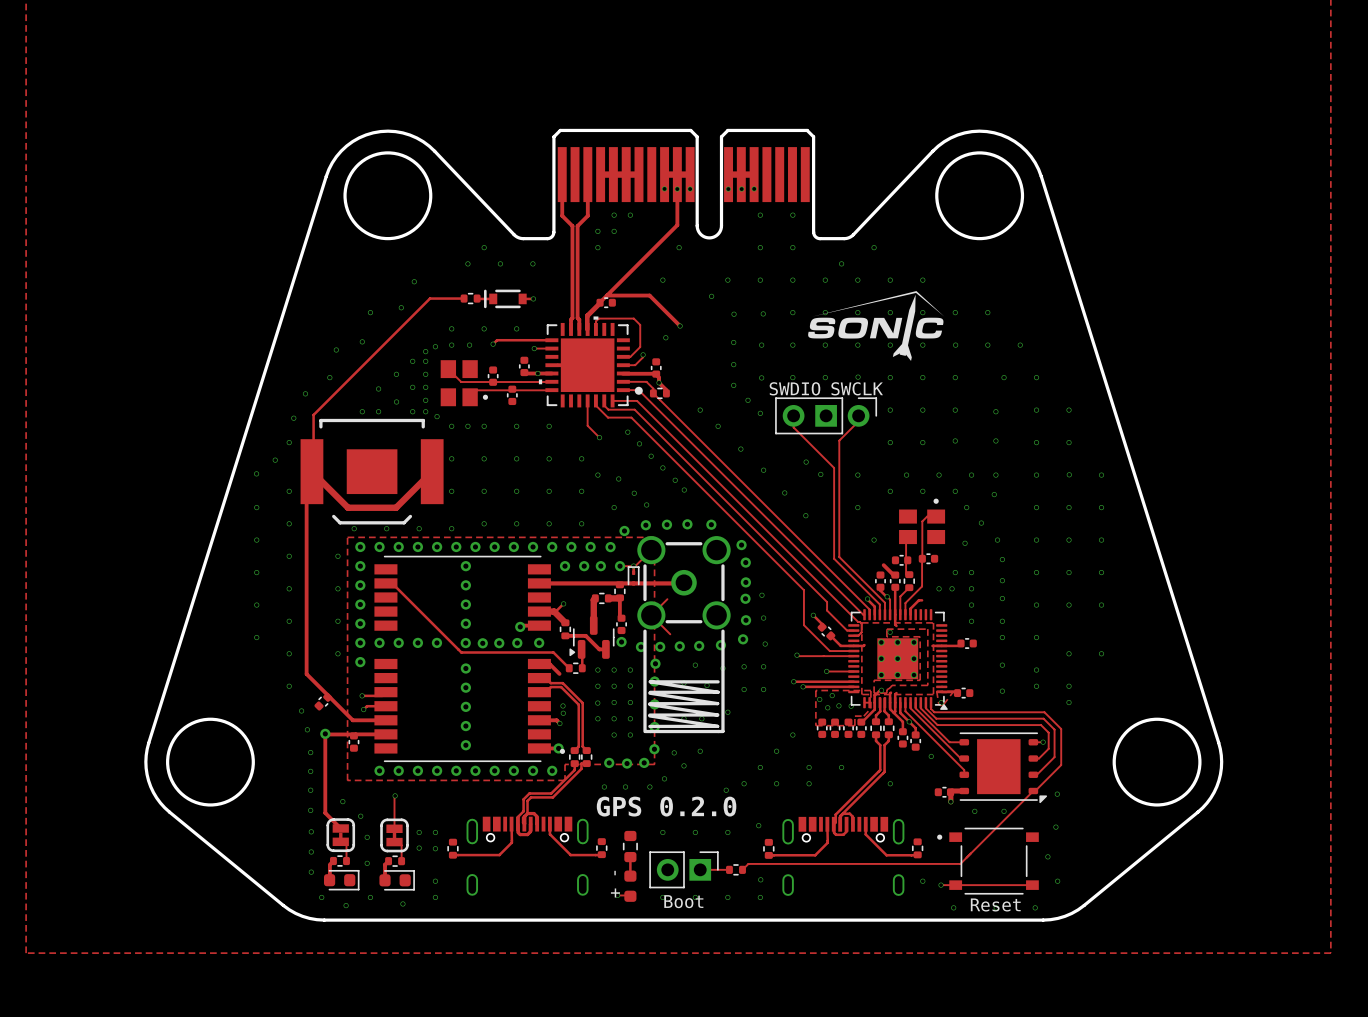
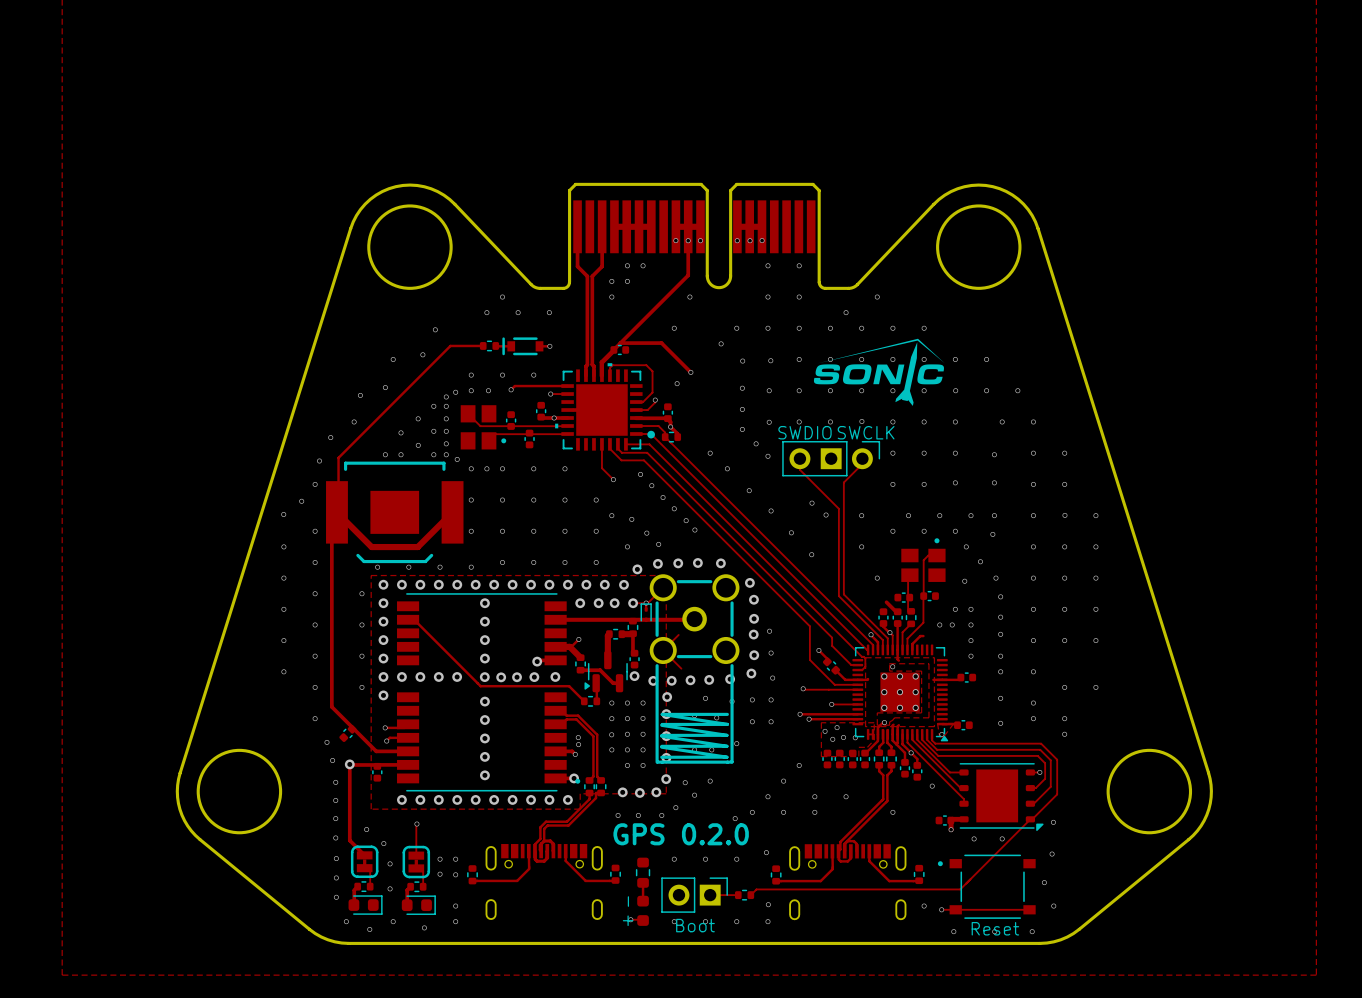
track: (539, 664) (549, 664) (559, 673) -> none

